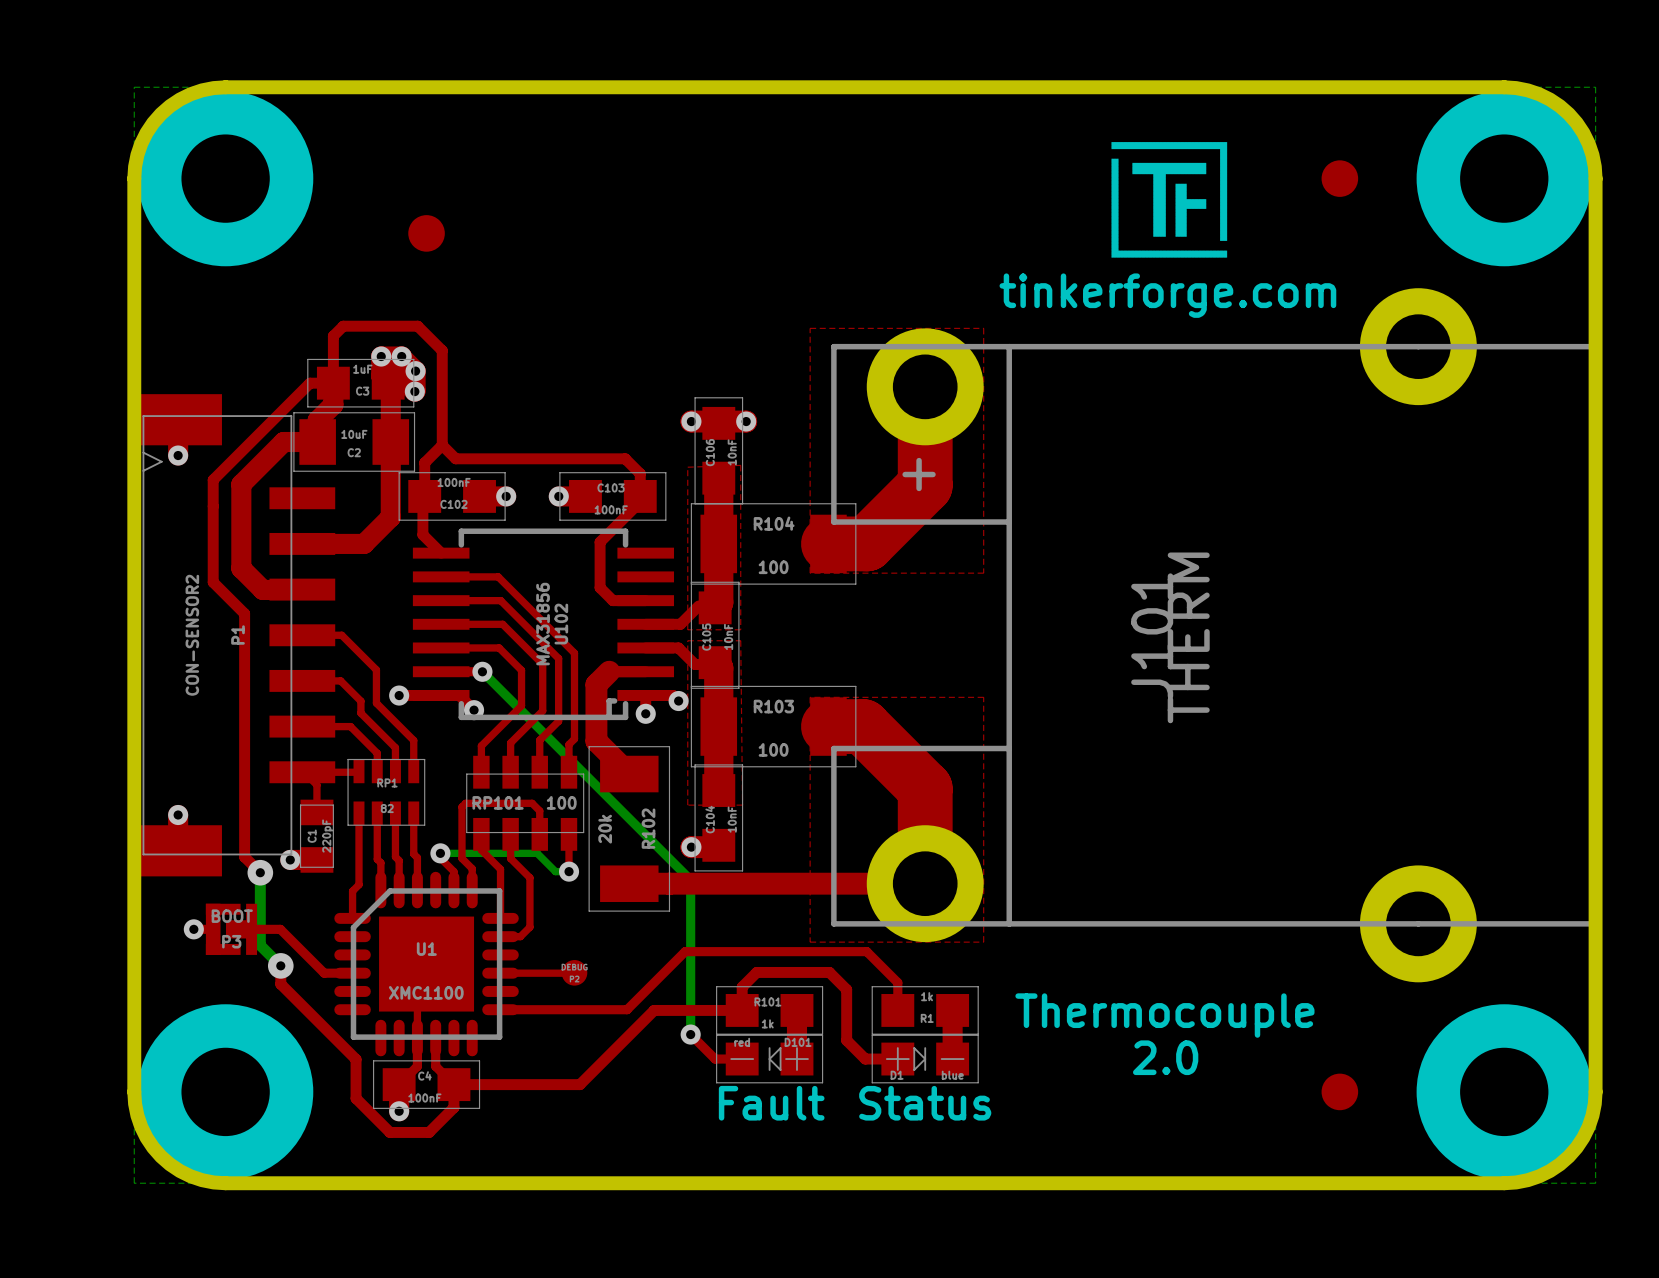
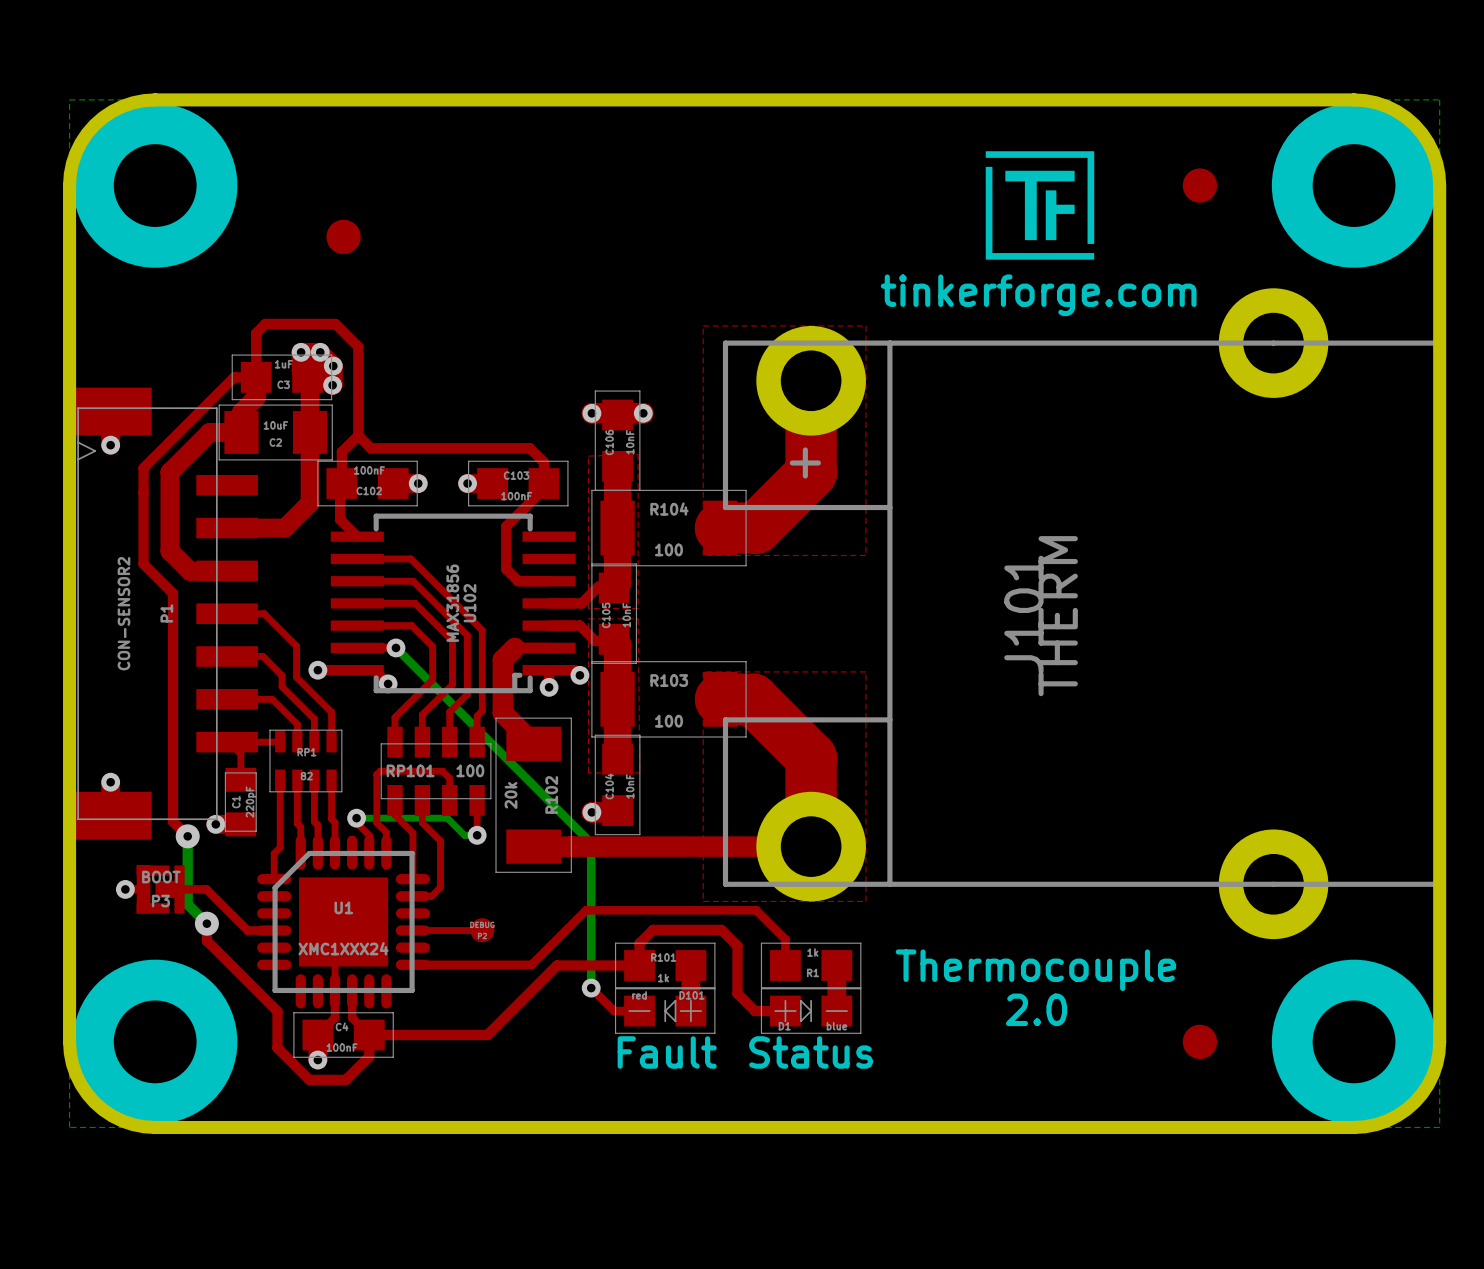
U1 value: XMC1100 (426, 992) -> XMC1XXX24 (343, 948)

